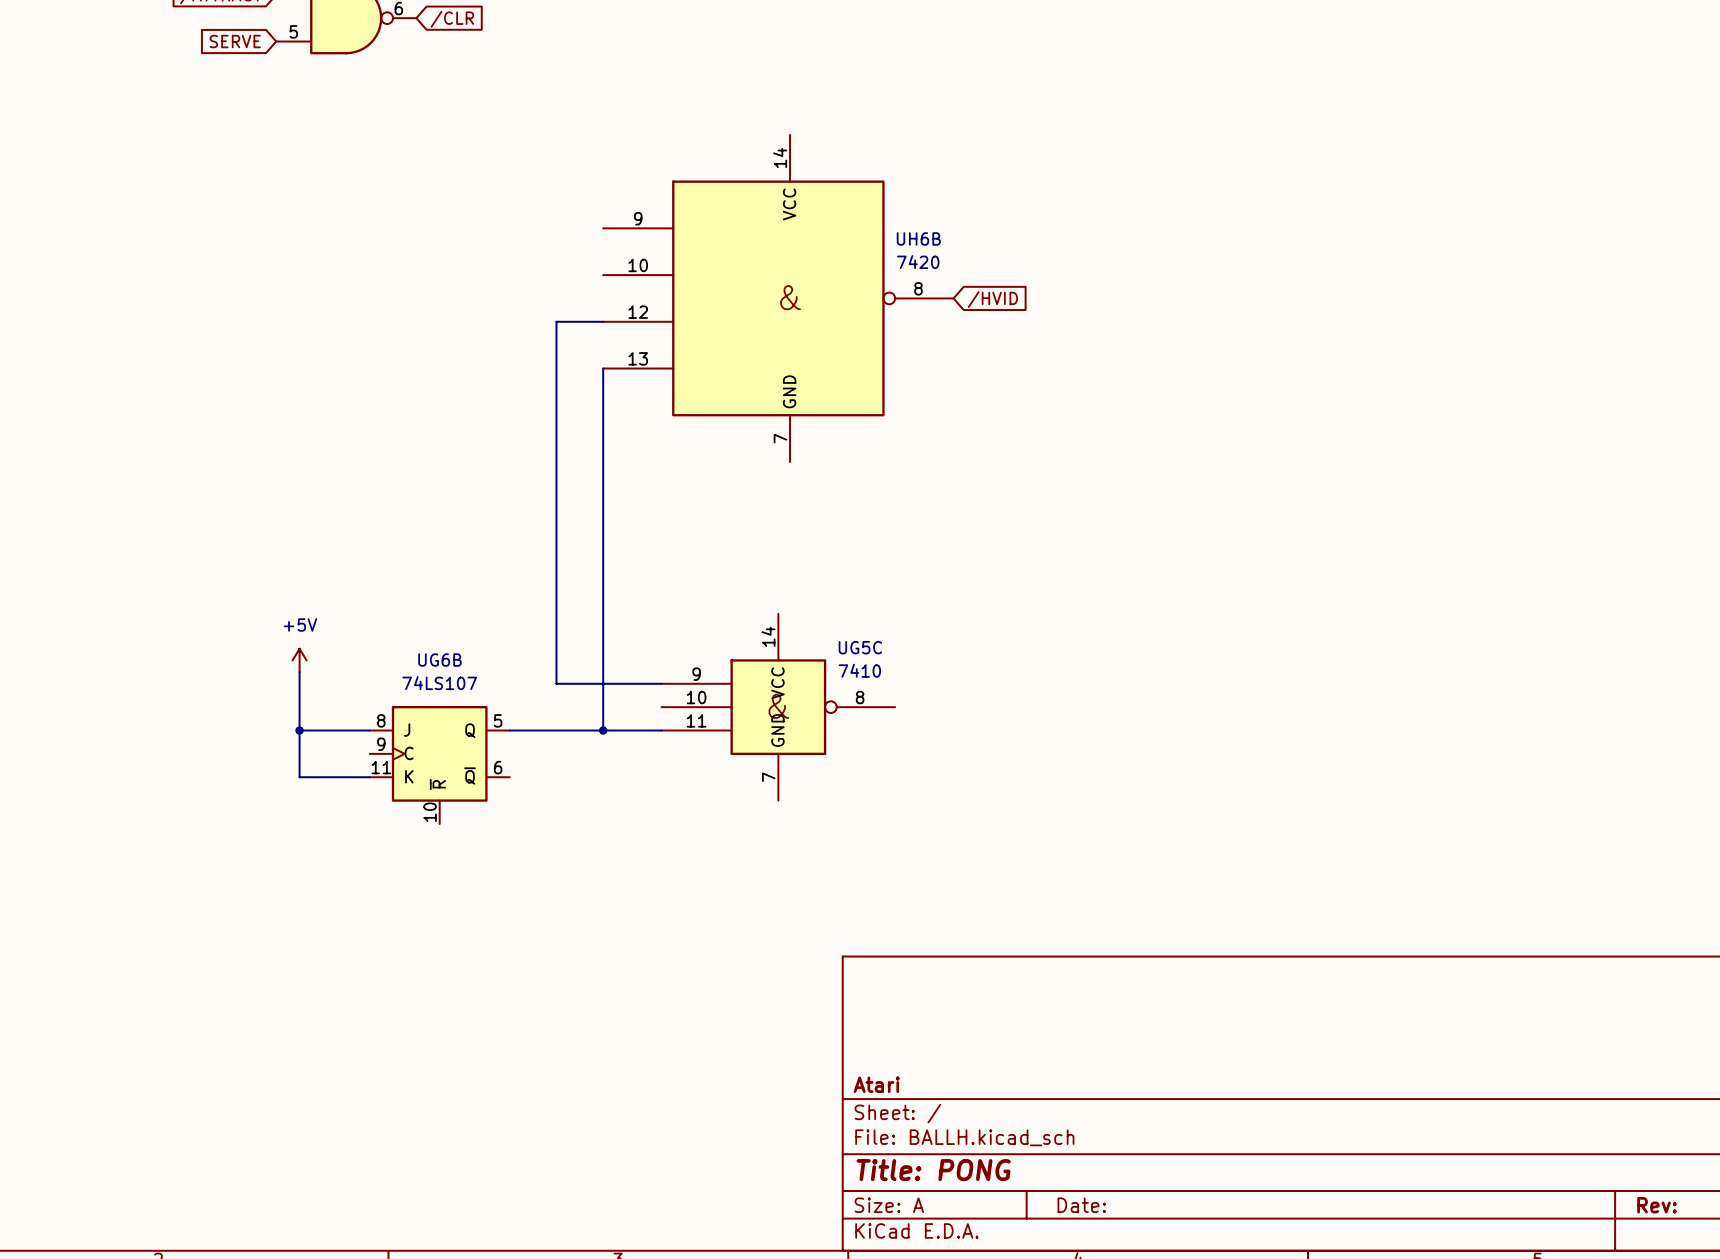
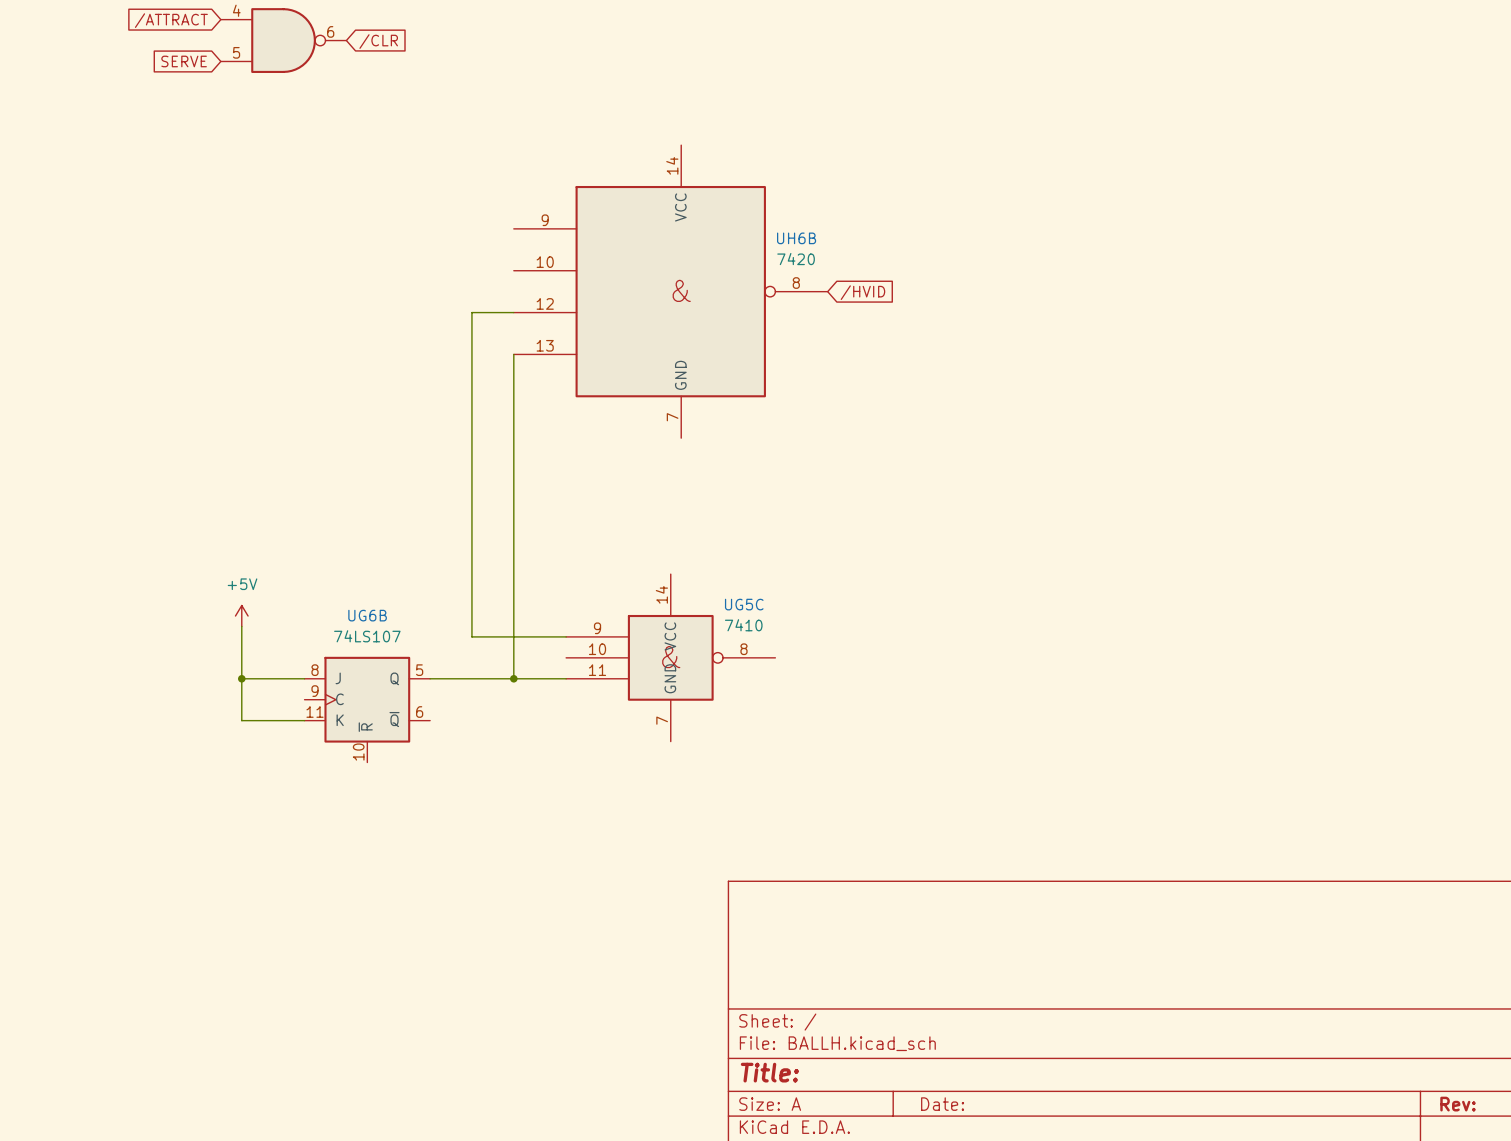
title block: Atari (876, 1084) -> none
title block: Title: PONG (933, 1170) -> Title: (769, 1072)

